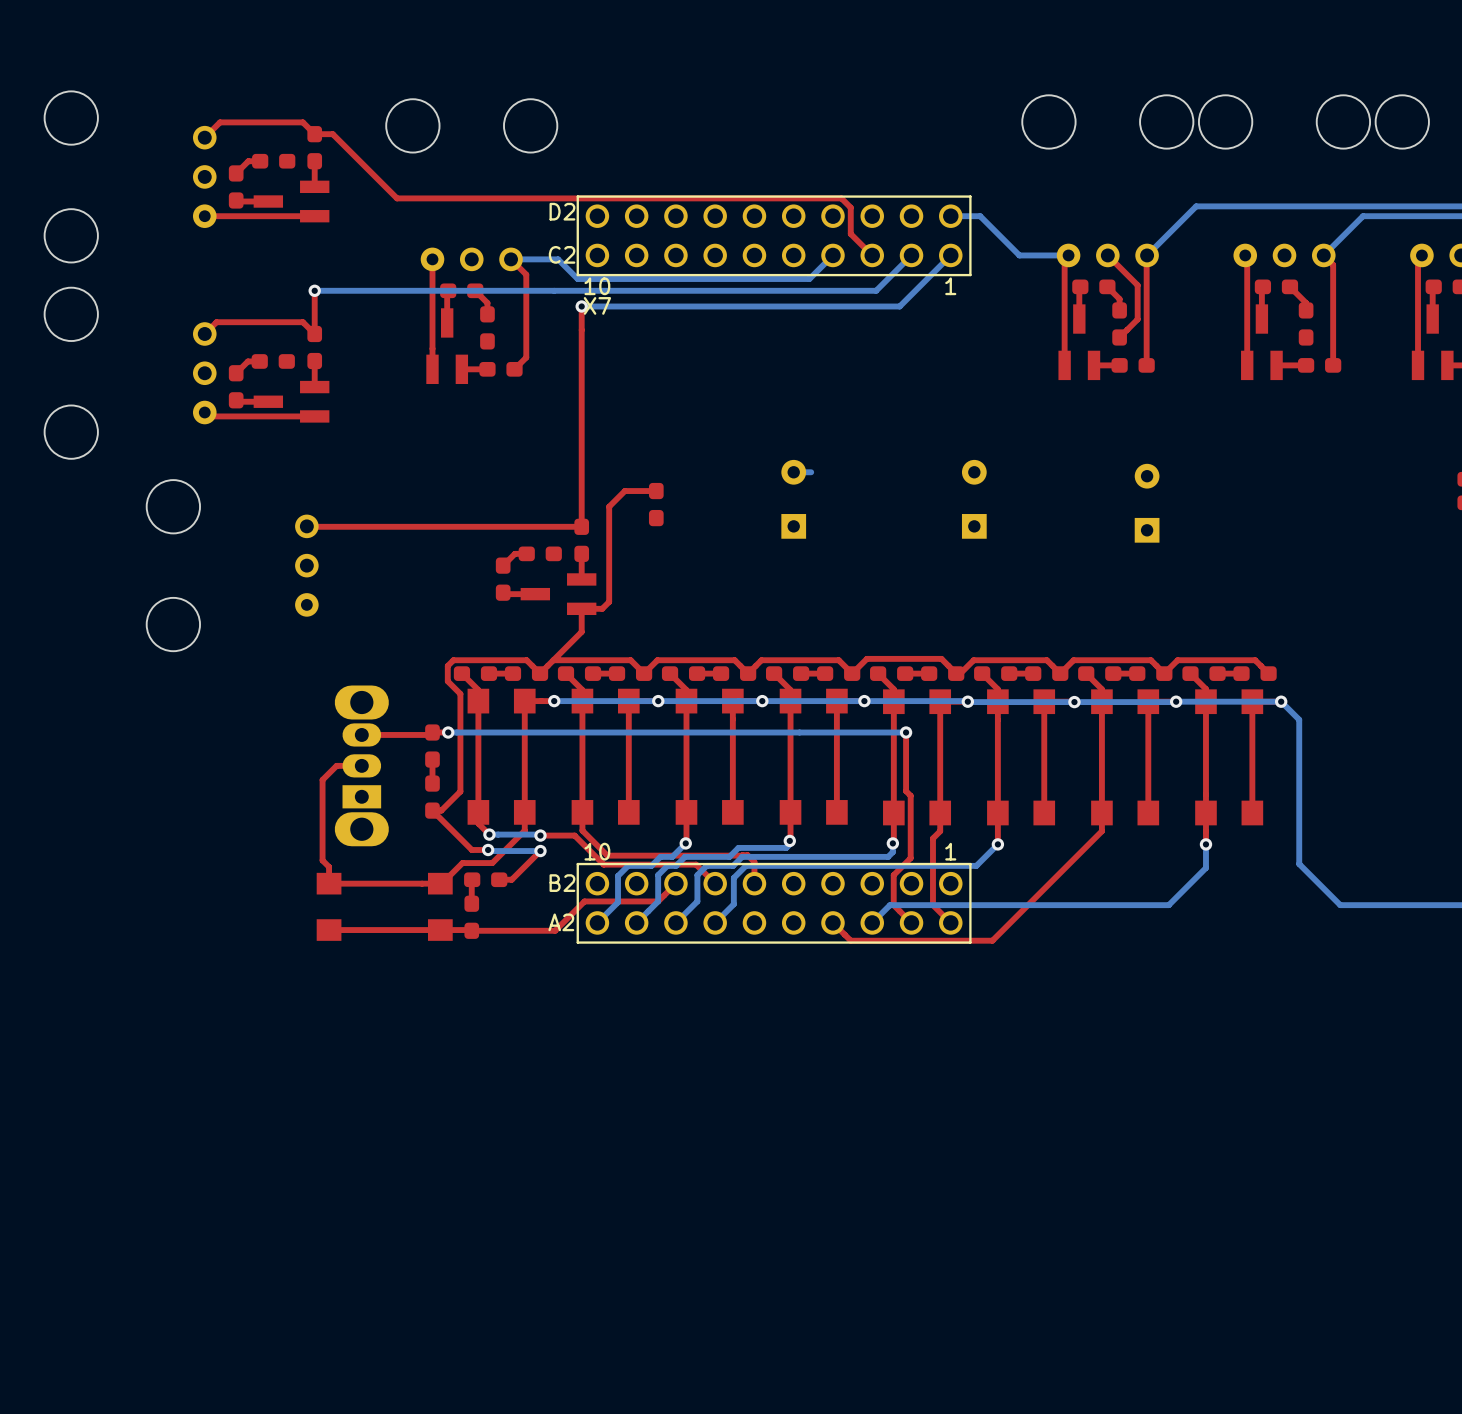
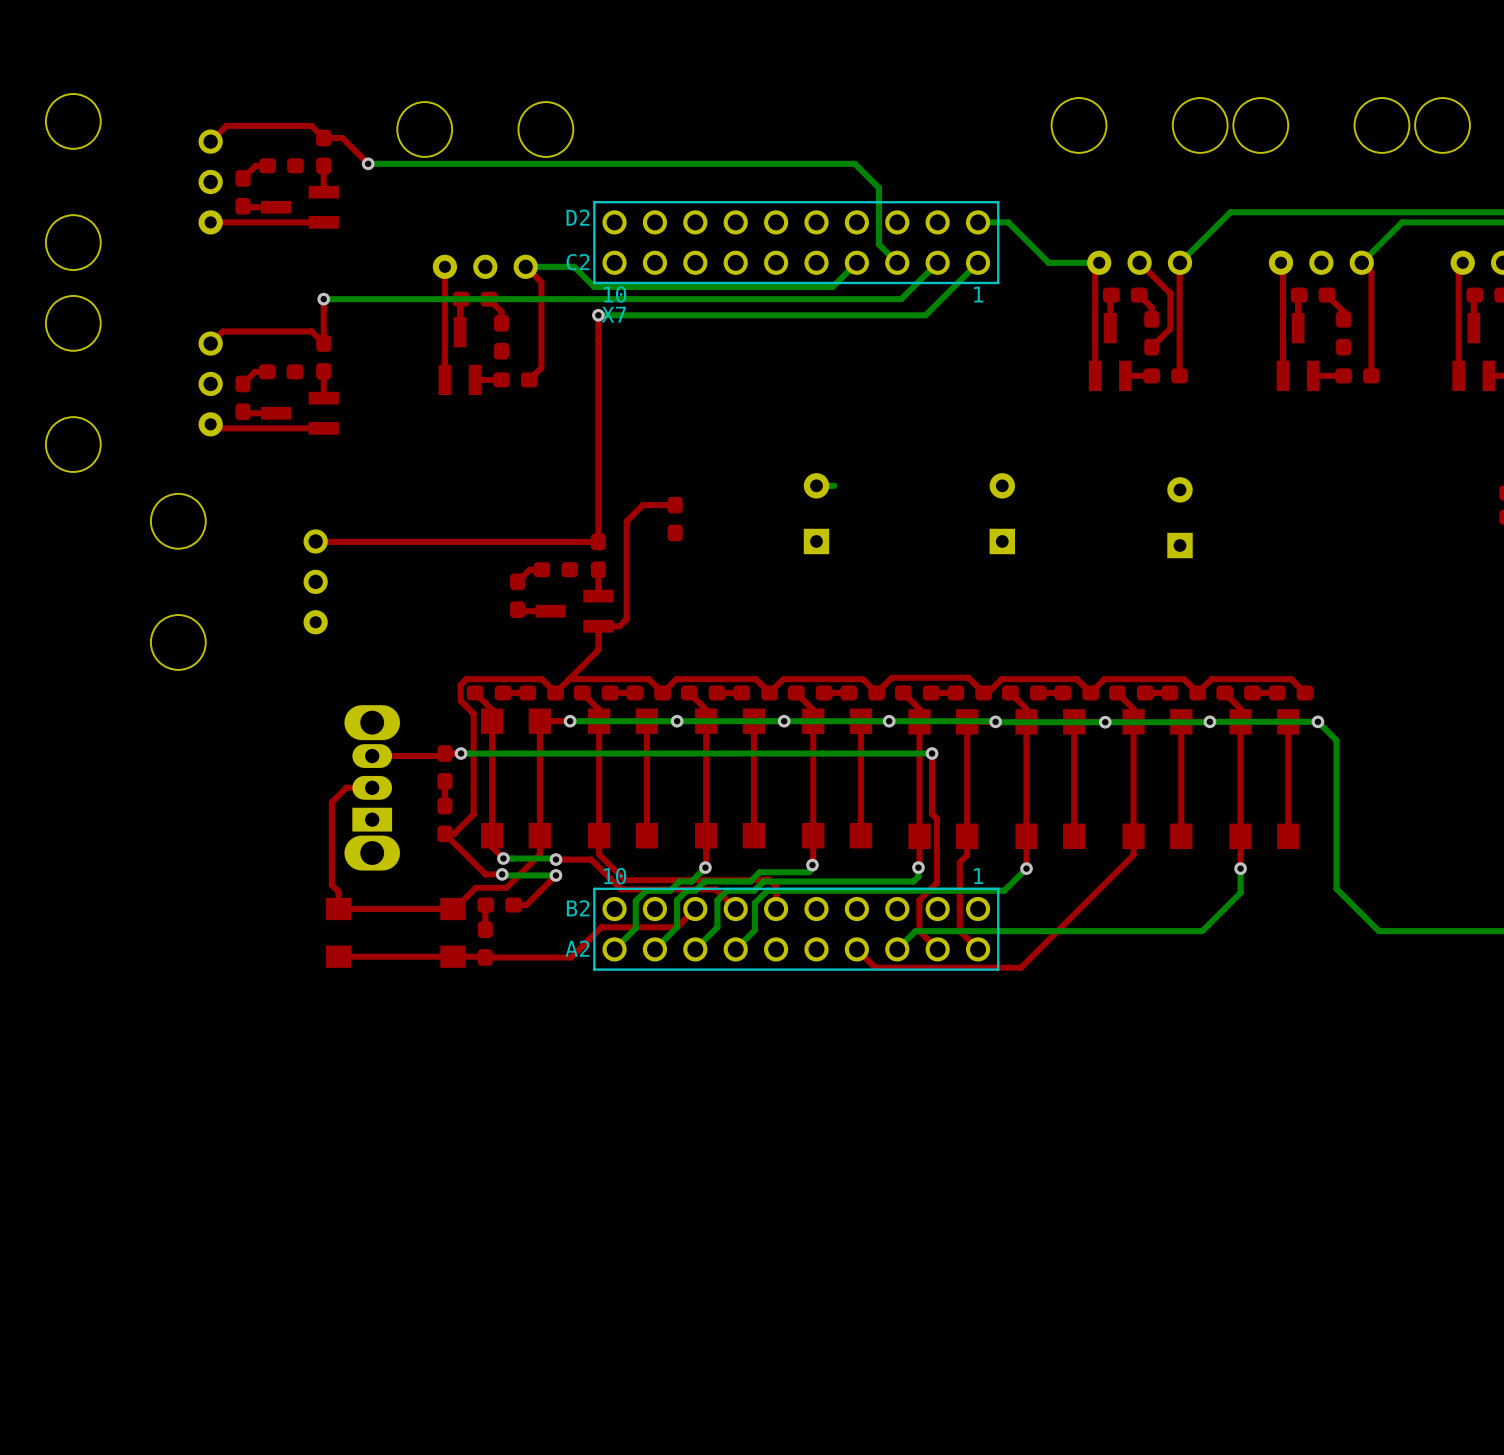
top track: (357, 159) (397, 198) (841, 198) (850, 207) (850, 233) (872, 255) -> none
bottom track: none -> (368, 163) (854, 163) (878, 187) (878, 244) (897, 262)
via: none -> (368, 163)

